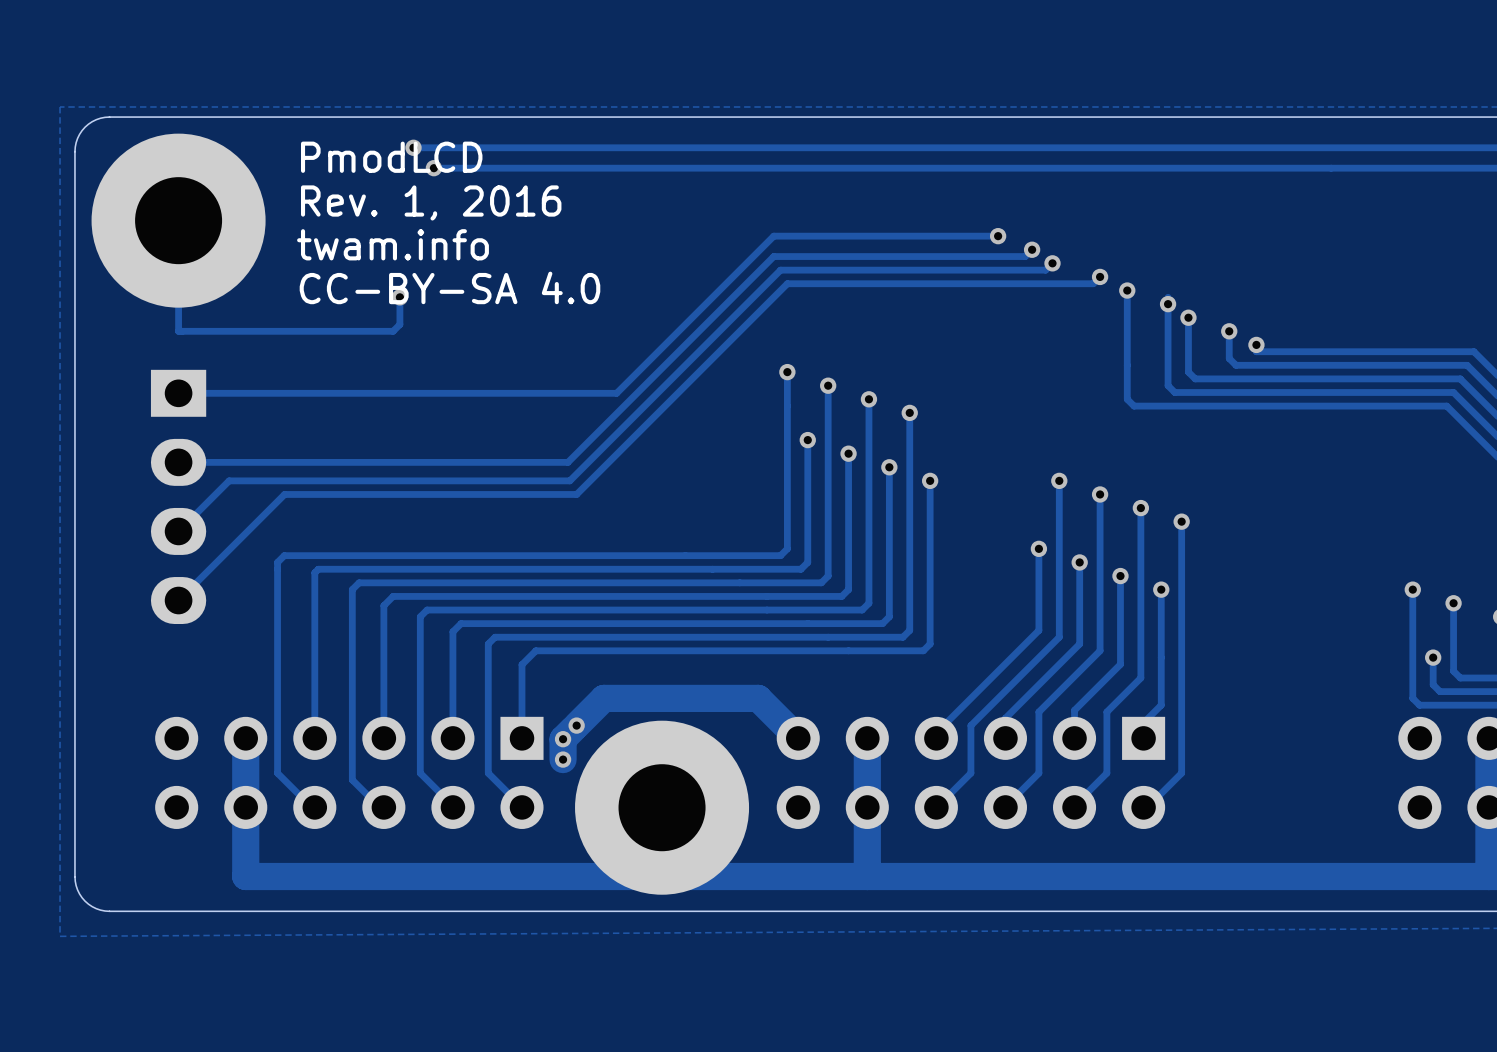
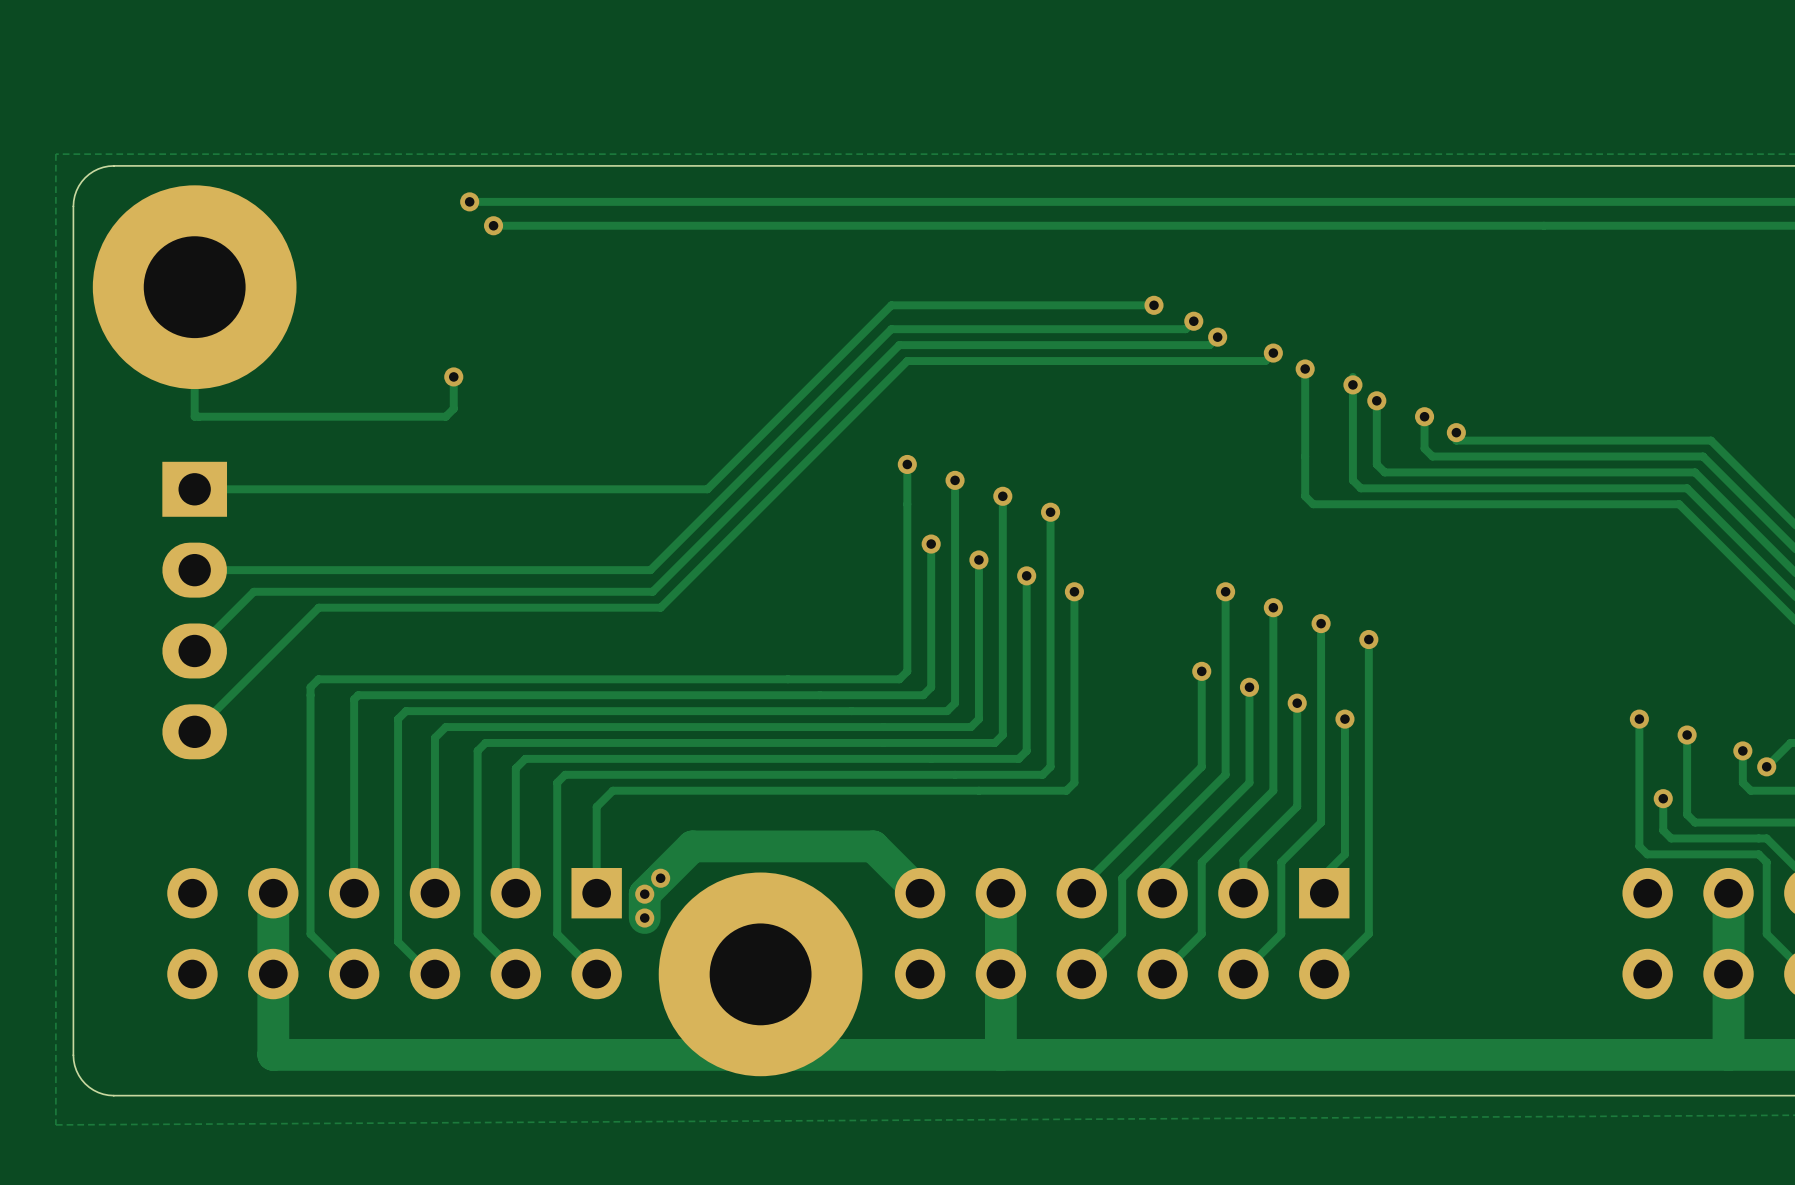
text: PmodLCD (391, 157) -> none
text: Rev. 1, 2016 (431, 202) -> none
text: twam.info (393, 244) -> none
text: CC-BY-SA 4.0 (449, 287) -> none

